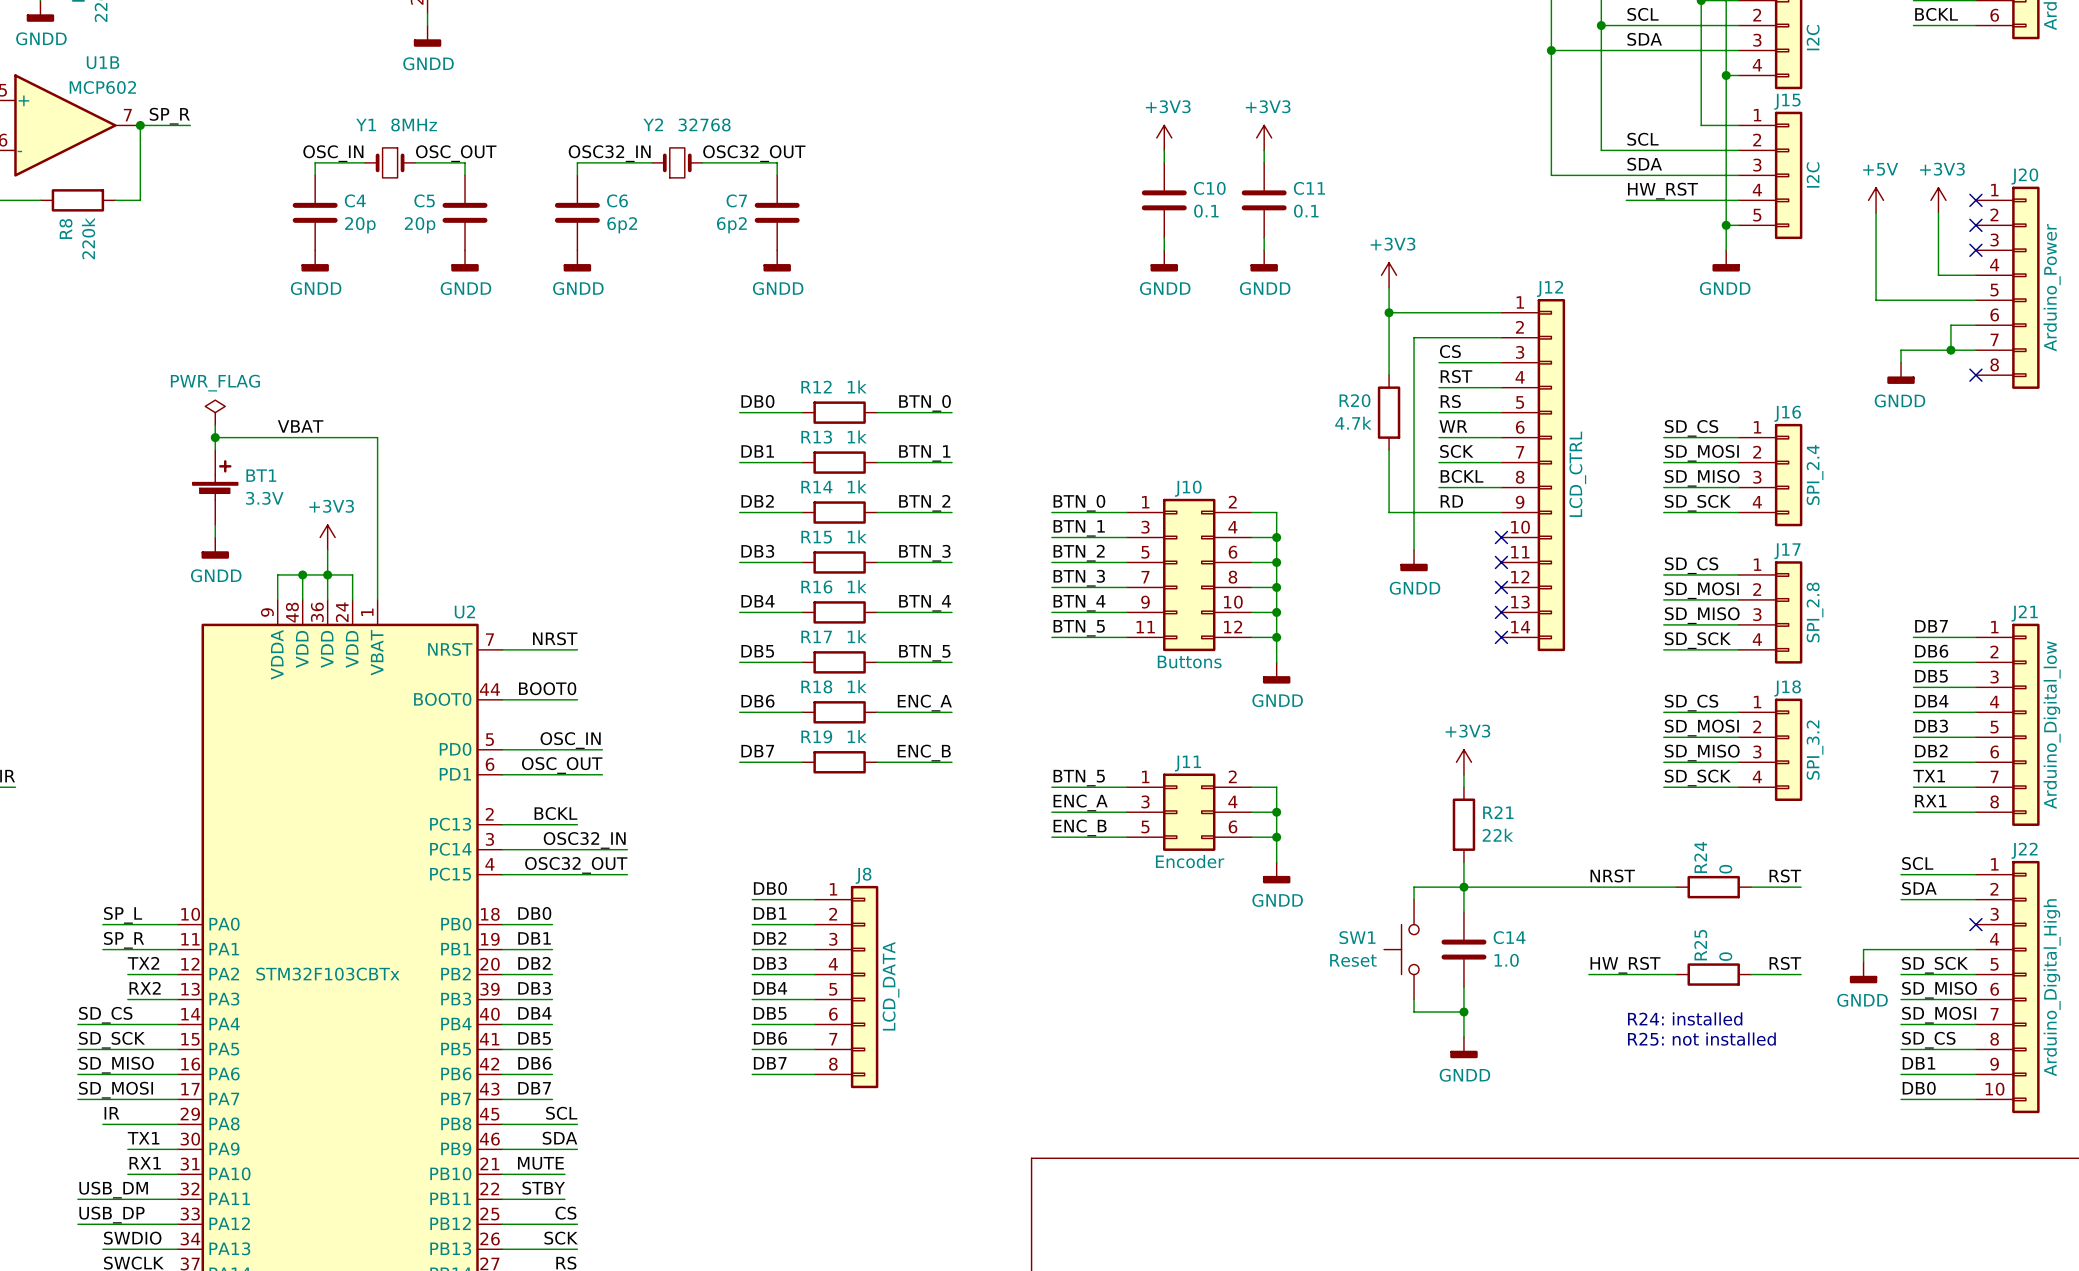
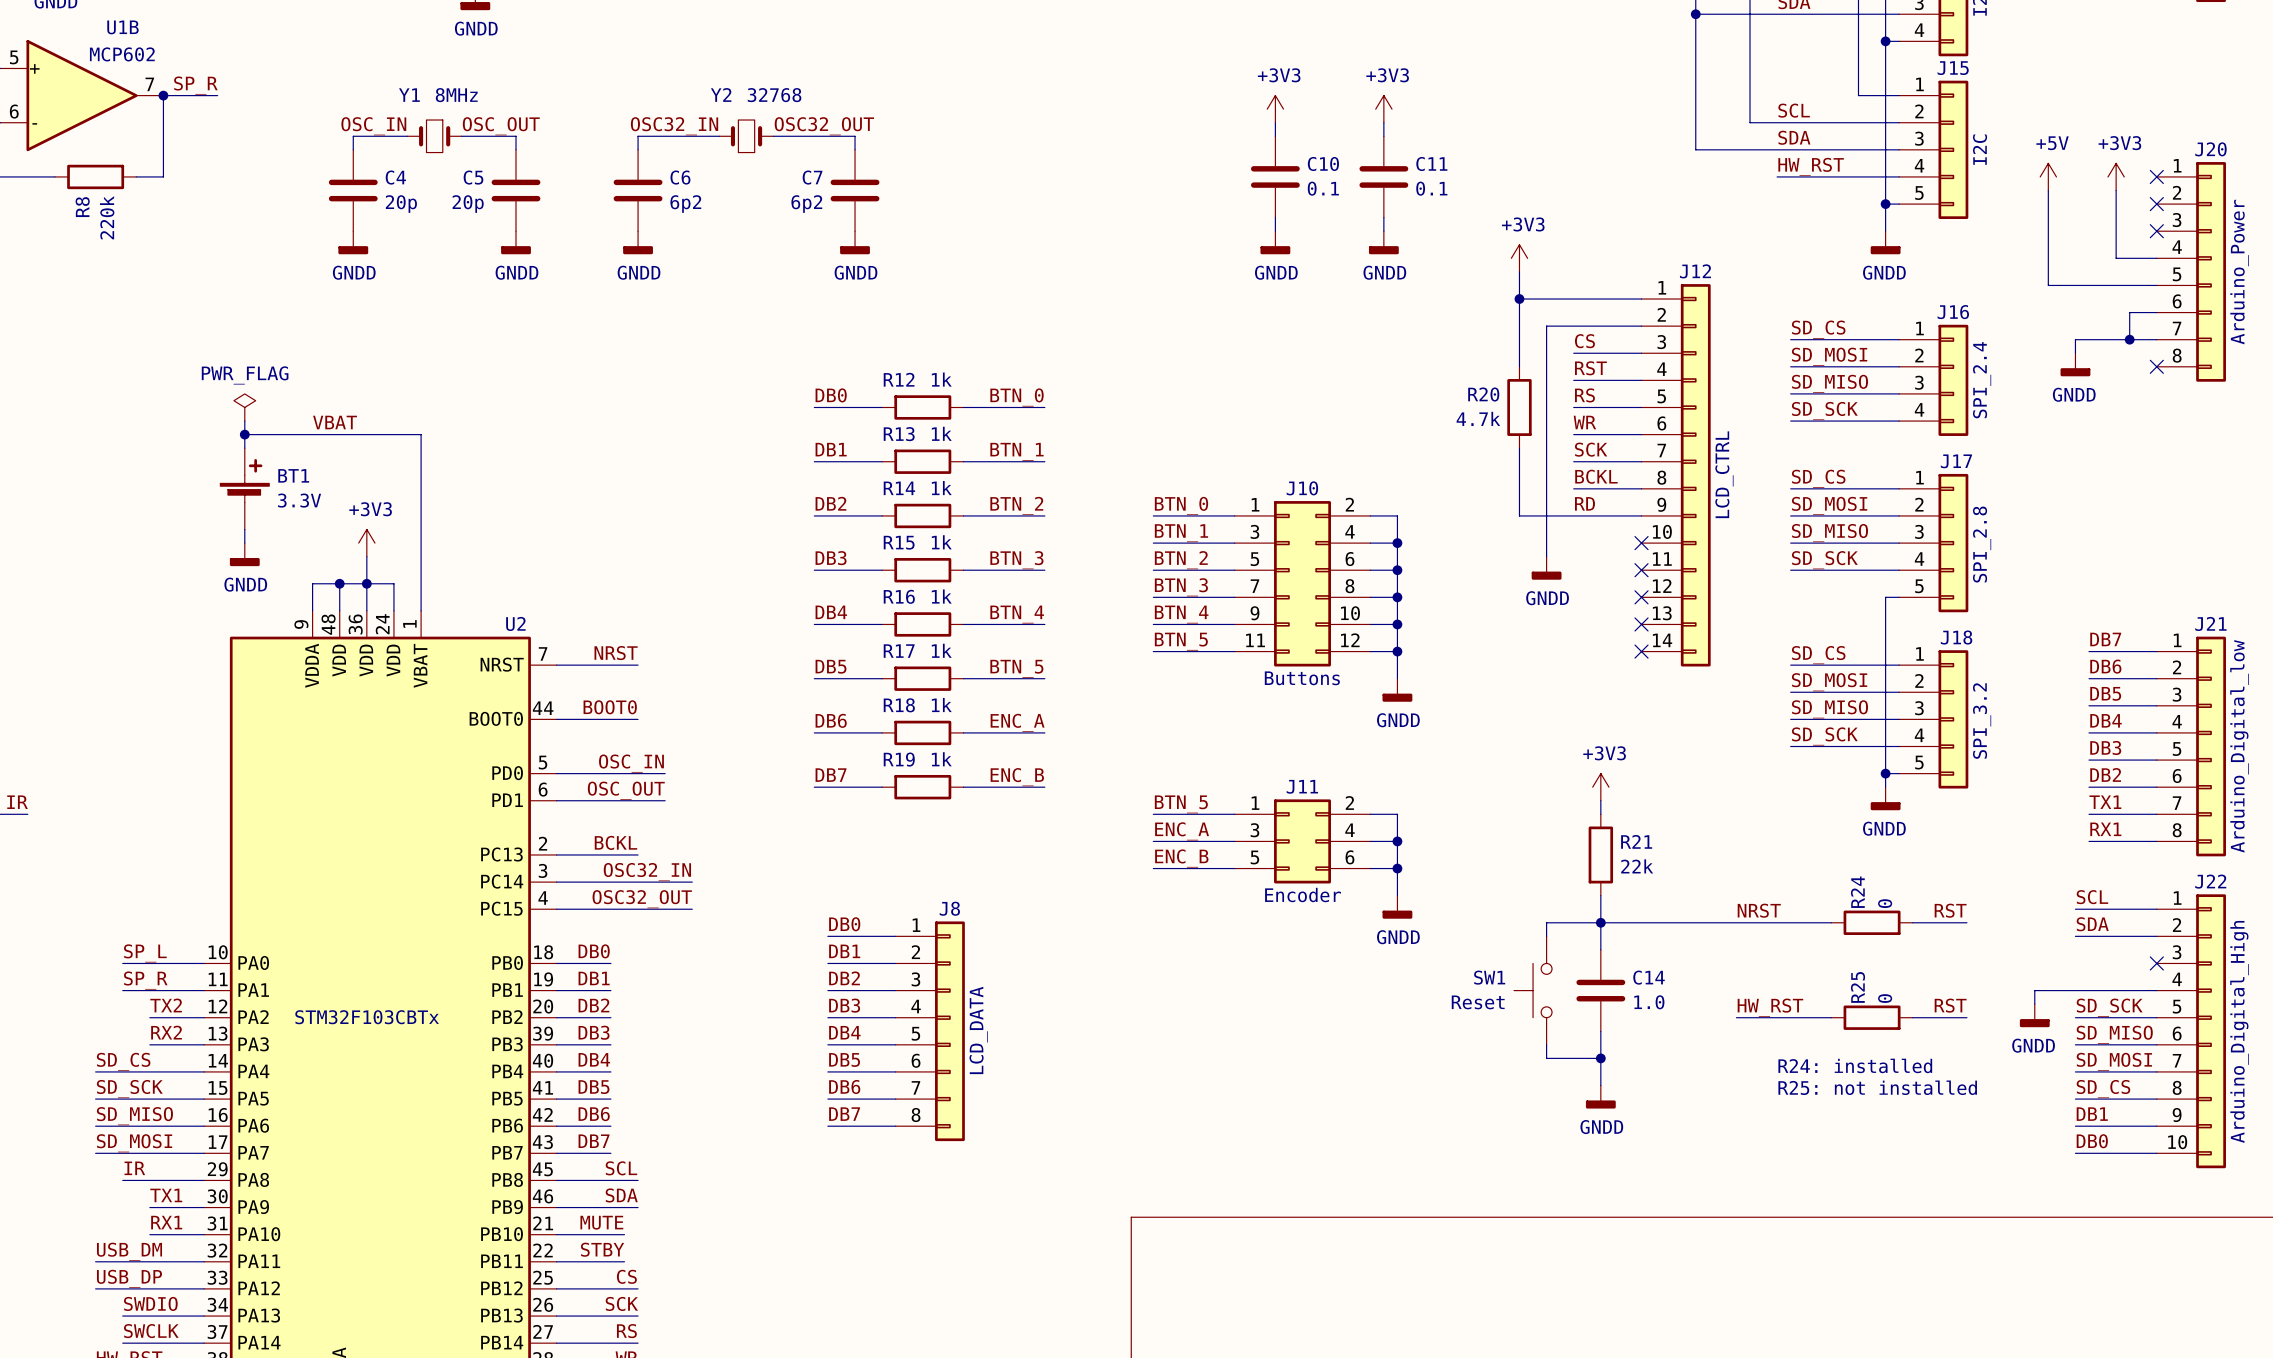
label: none -> SD_CS (1818, 329)
wire: none -> (1790, 339) (1899, 339)
label: none -> SD_MOSI (1829, 356)
wire: none -> (1790, 366) (1899, 366)
label: none -> SD_MISO (1829, 383)
wire: none -> (1790, 393) (1899, 393)
wire: none -> (1790, 421) (1899, 421)
label: SD_CS (1691, 428) -> SD_SCK (1824, 411)
wire: (1663, 437) (1738, 437) -> none
label: SD_MOSI (1701, 453) -> none
wire: (1663, 462) (1738, 462) -> none
J16 position: (1770, 475) -> (1933, 380)
label: none -> SD_CS (1818, 478)
label: SD_MISO (1702, 478) -> none
wire: none -> (1790, 488) (1817, 488)
label: none -> SD_MOSI (1829, 505)
label: SD_SCK (1697, 503) -> none
wire: none -> (1790, 515) (1817, 515)
label: none -> SD_MISO (1829, 533)
wire: none -> (1790, 543) (1899, 543)
J17 symbol: [1738, 561, 1803, 664] -> [1899, 473, 1969, 613]
wire: none -> (1790, 570) (1899, 570)
label: SD_CS (1691, 565) -> SD_SCK (1824, 560)
wire: (1663, 574) (1738, 574) -> none
wire: none -> (1899, 597) (1885, 597) (1885, 787)
label: SD_MOSI (1701, 590) -> none
wire: (1663, 599) (1738, 599) -> none
label: SD_MISO (1702, 615) -> none
wire: (1663, 624) (1738, 624) -> none
label: none -> SD_CS (1818, 655)
label: SD_SCK (1697, 640) -> none
wire: none -> (1790, 665) (1817, 665)
label: none -> SD_MOSI (1829, 682)
wire: none -> (1790, 692) (1899, 692)
label: none -> SD_MISO (1829, 709)
J18 symbol: [1738, 698, 1803, 801] -> [1899, 650, 1969, 789]
wire: none -> (1790, 719) (1899, 719)
label: SD_CS (1691, 703) -> none
wire: (1663, 712) (1738, 712) -> none
label: none -> SD_SCK (1824, 736)
wire: none -> (1790, 746) (1899, 746)
label: SD_MOSI (1701, 728) -> none
wire: (1663, 737) (1738, 737) -> none
wire: none -> (1885, 773) (1899, 773)
junction: none -> (1885, 773)
label: SD_MISO (1702, 753) -> none
wire: (1663, 762) (1738, 762) -> none
power symbol: none -> GNDD (1885, 798)
label: SD_SCK (1697, 778) -> none
wire: (1663, 787) (1738, 787) -> none

